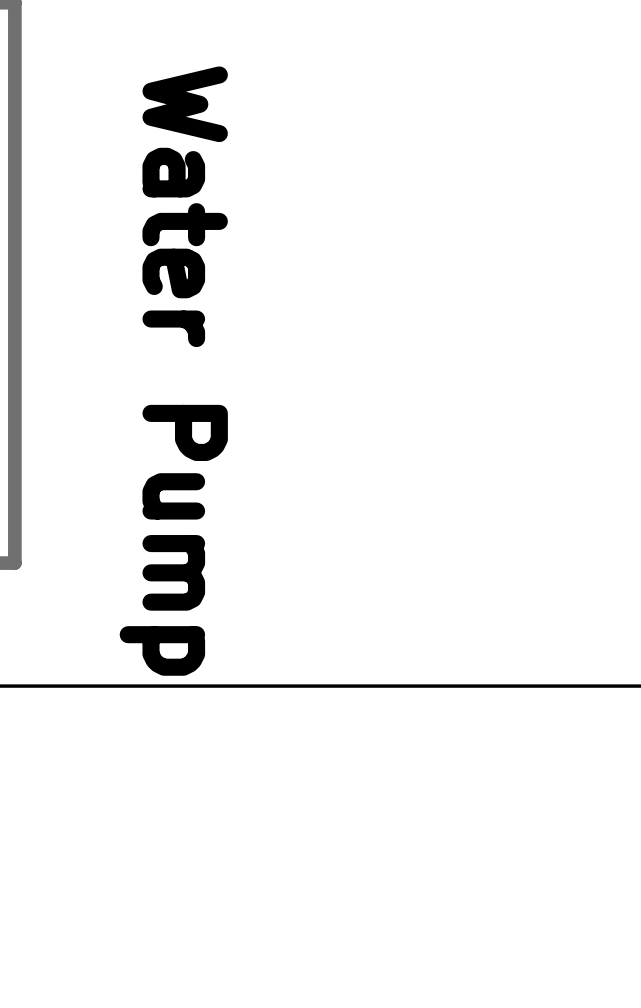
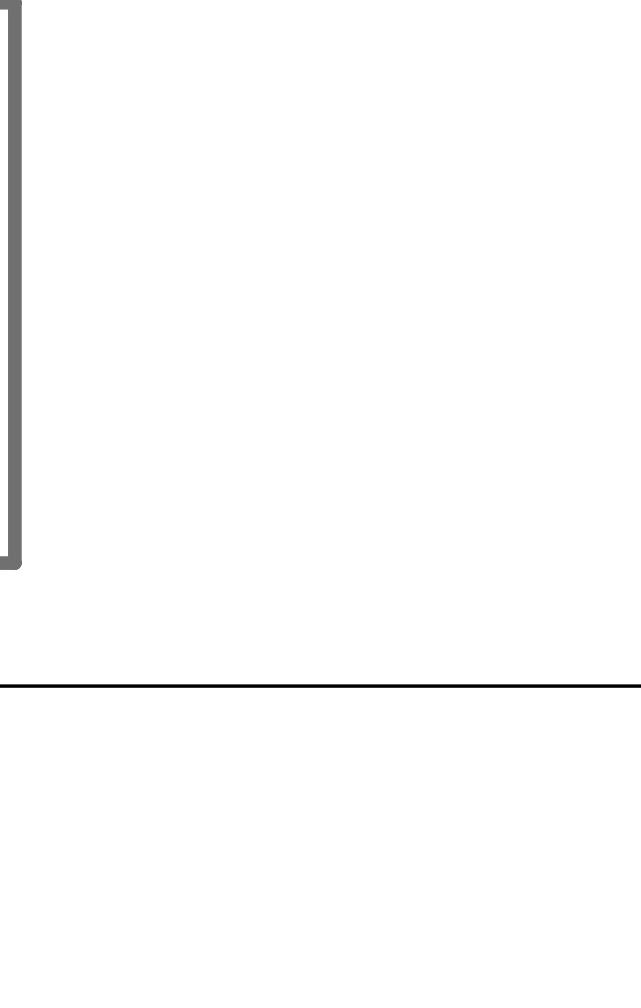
text: Water Pump (173, 371) -> none

